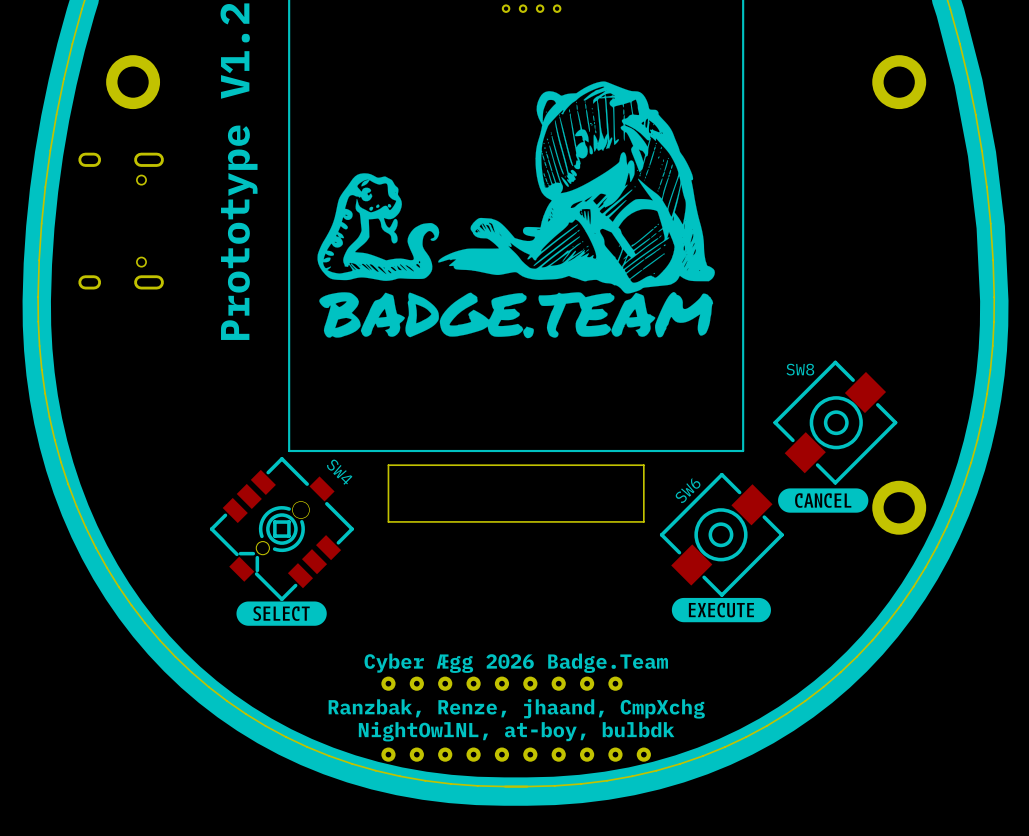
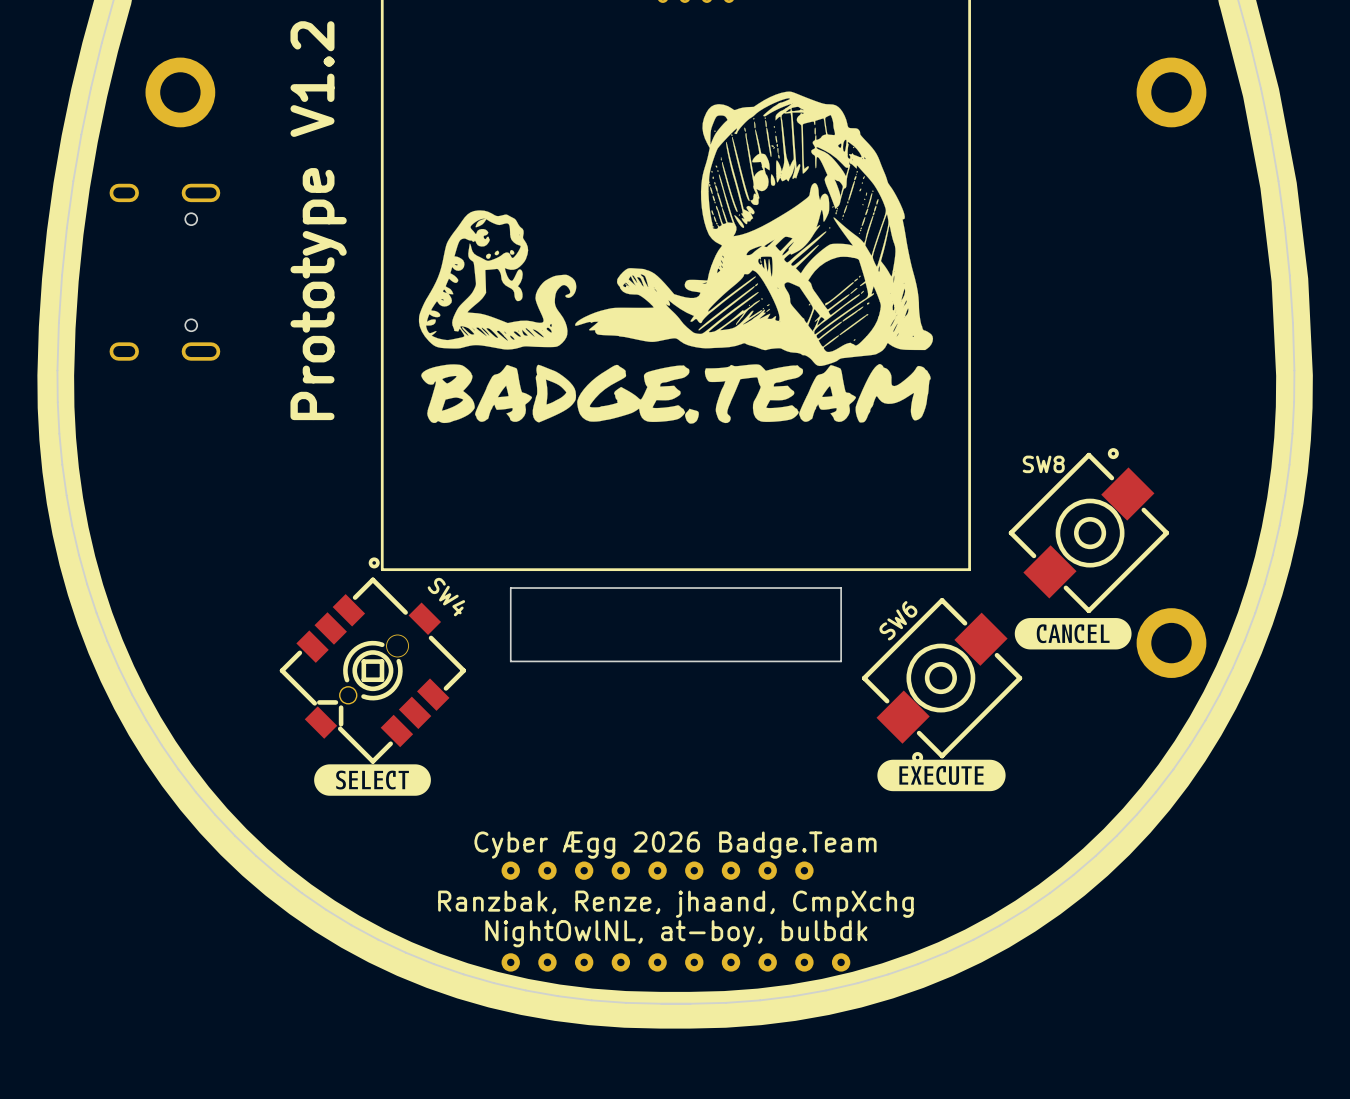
SW8 footprint: [773, 360, 898, 485] -> [1008, 448, 1170, 614]
SW4 footprint: [209, 457, 354, 602] -> [279, 557, 467, 764]
SW6 footprint: [659, 472, 784, 597] -> [861, 598, 1023, 764]

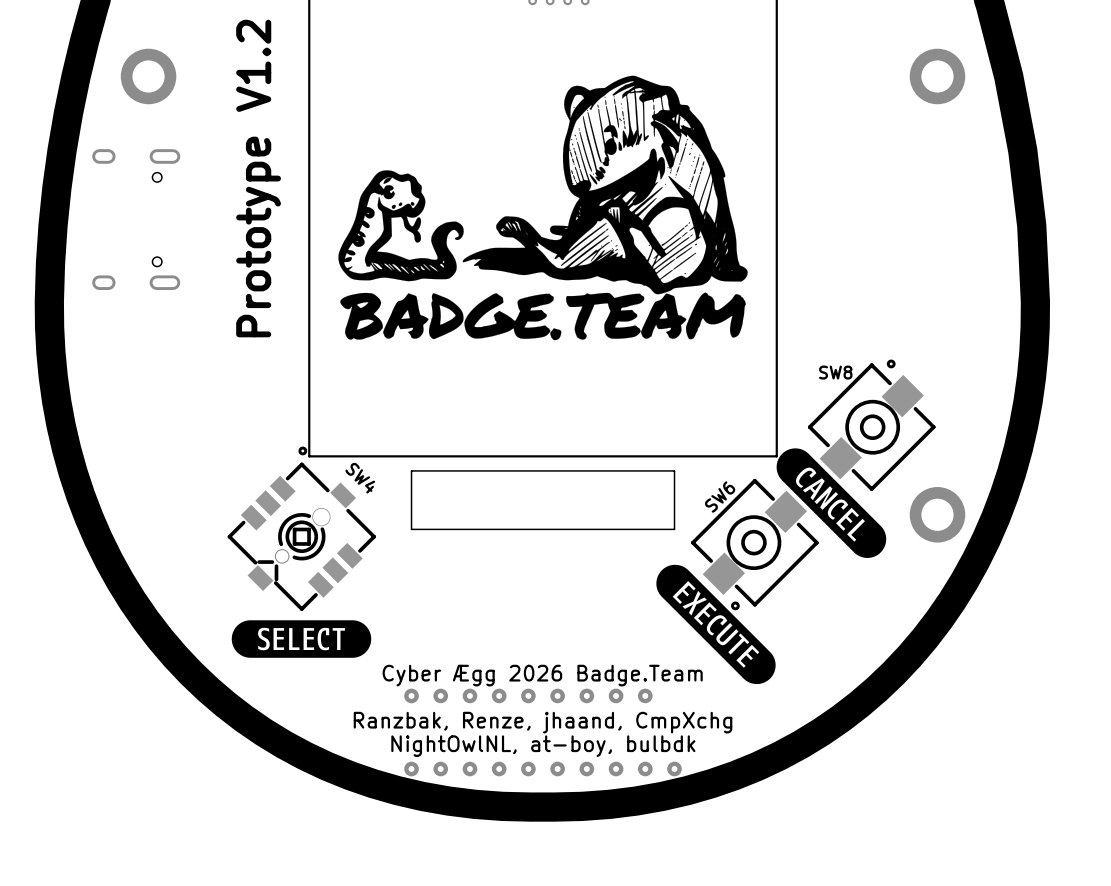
drawing: none -> [656, 448, 887, 685]
drawing: [1014, 618, 1132, 650] -> none
drawing: [877, 759, 1006, 792] -> none
drawing: [314, 764, 431, 796] -> none
drawing: none -> [231, 620, 372, 658]

